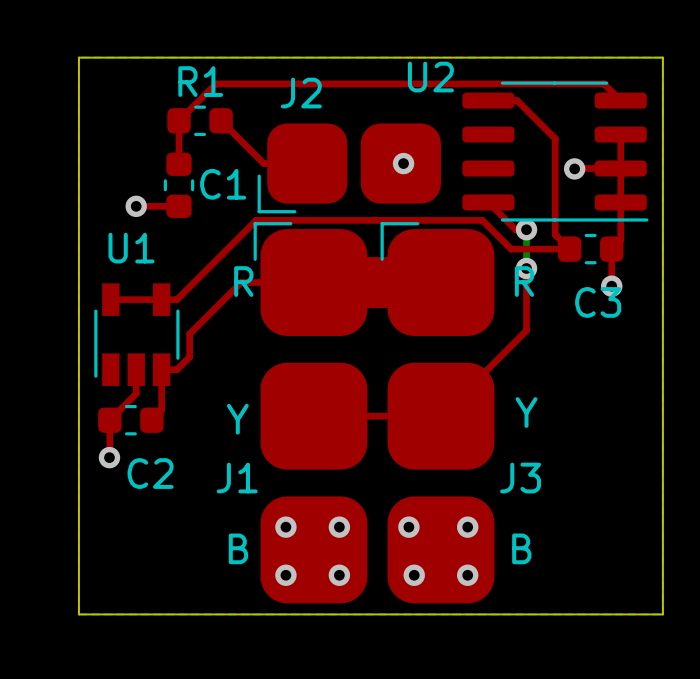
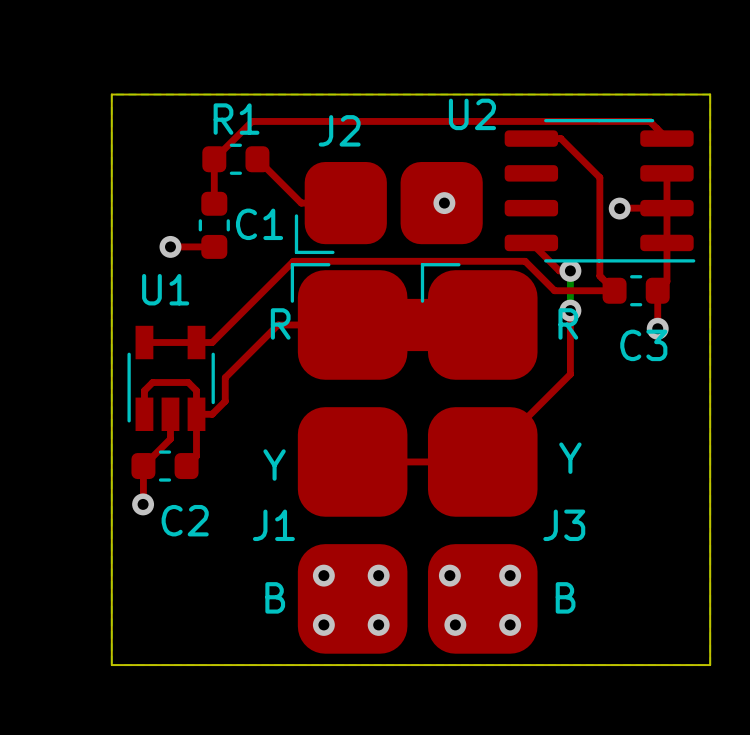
top track: none -> (144, 414) (144, 390) (152, 382) (188, 382) (196, 390) (196, 414)

